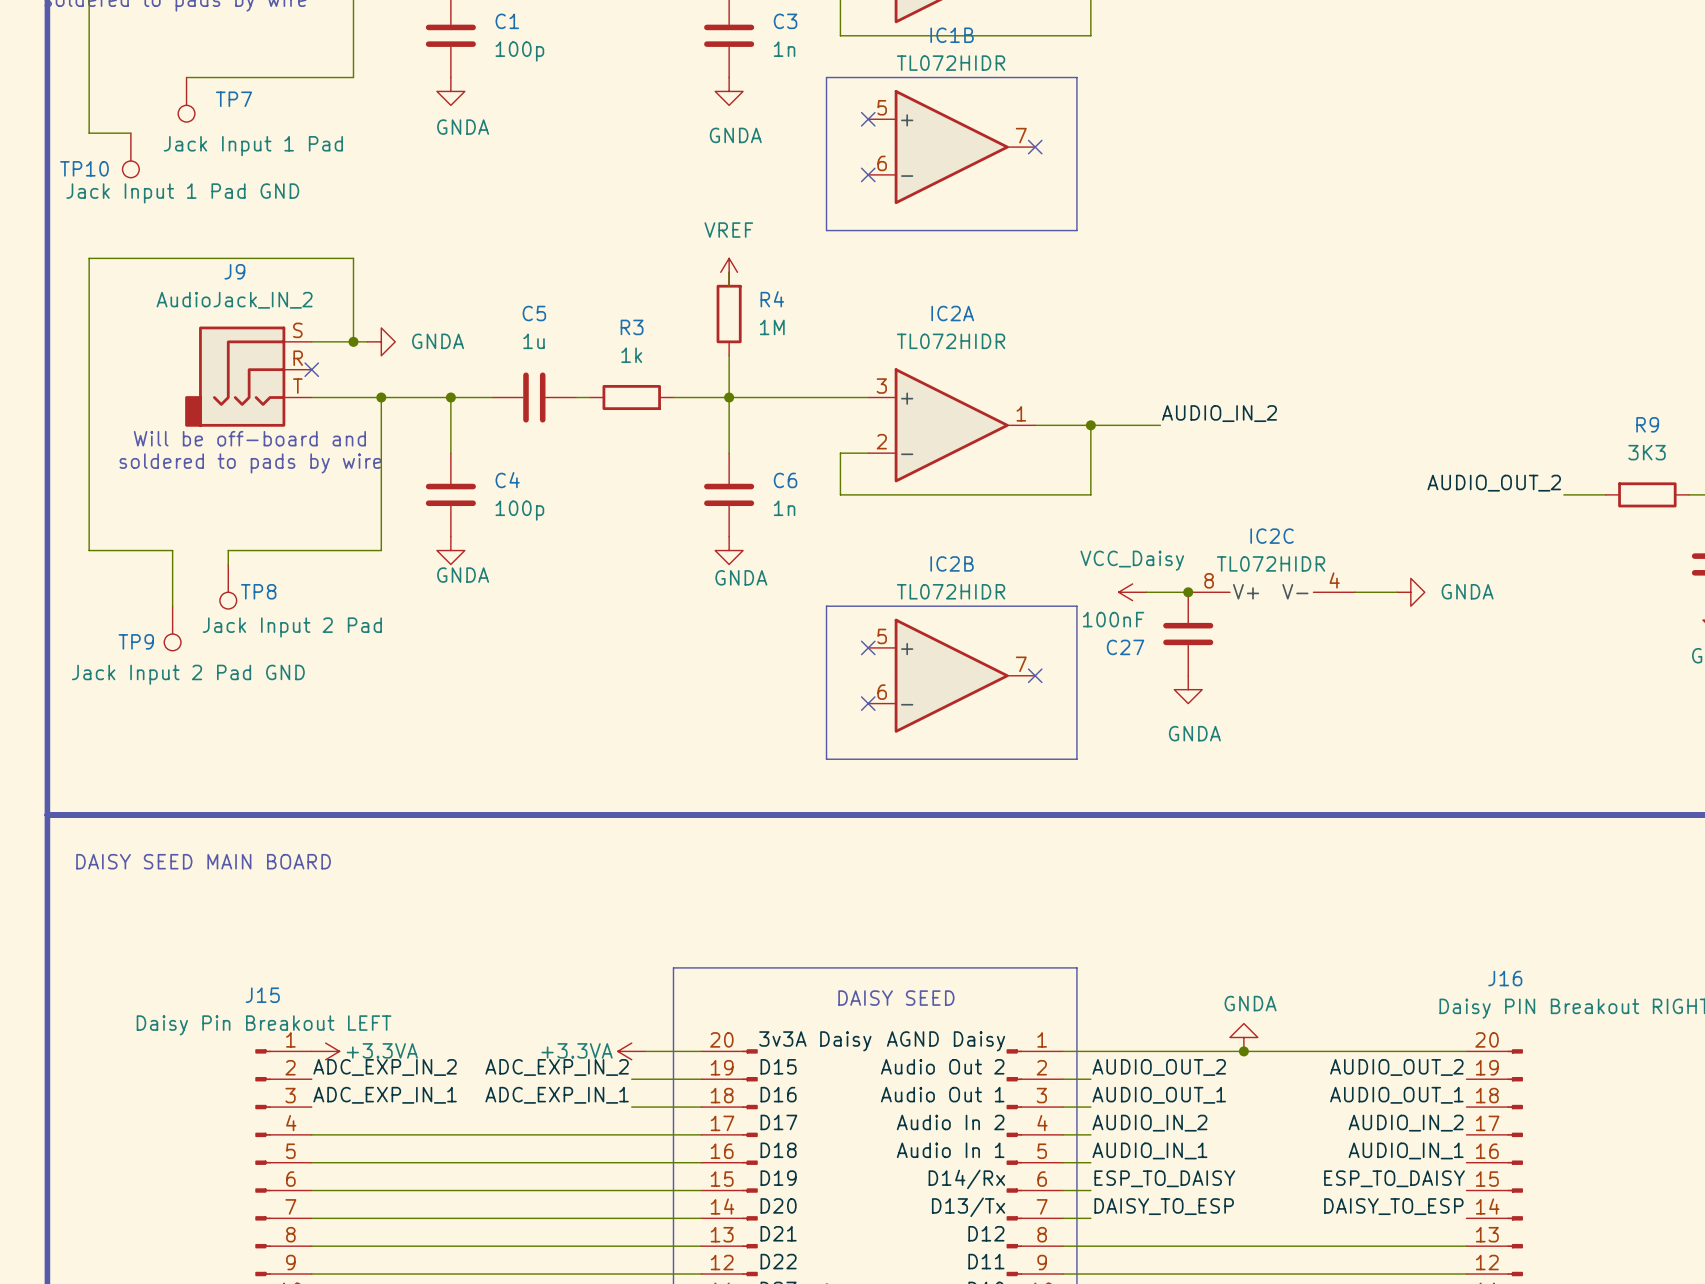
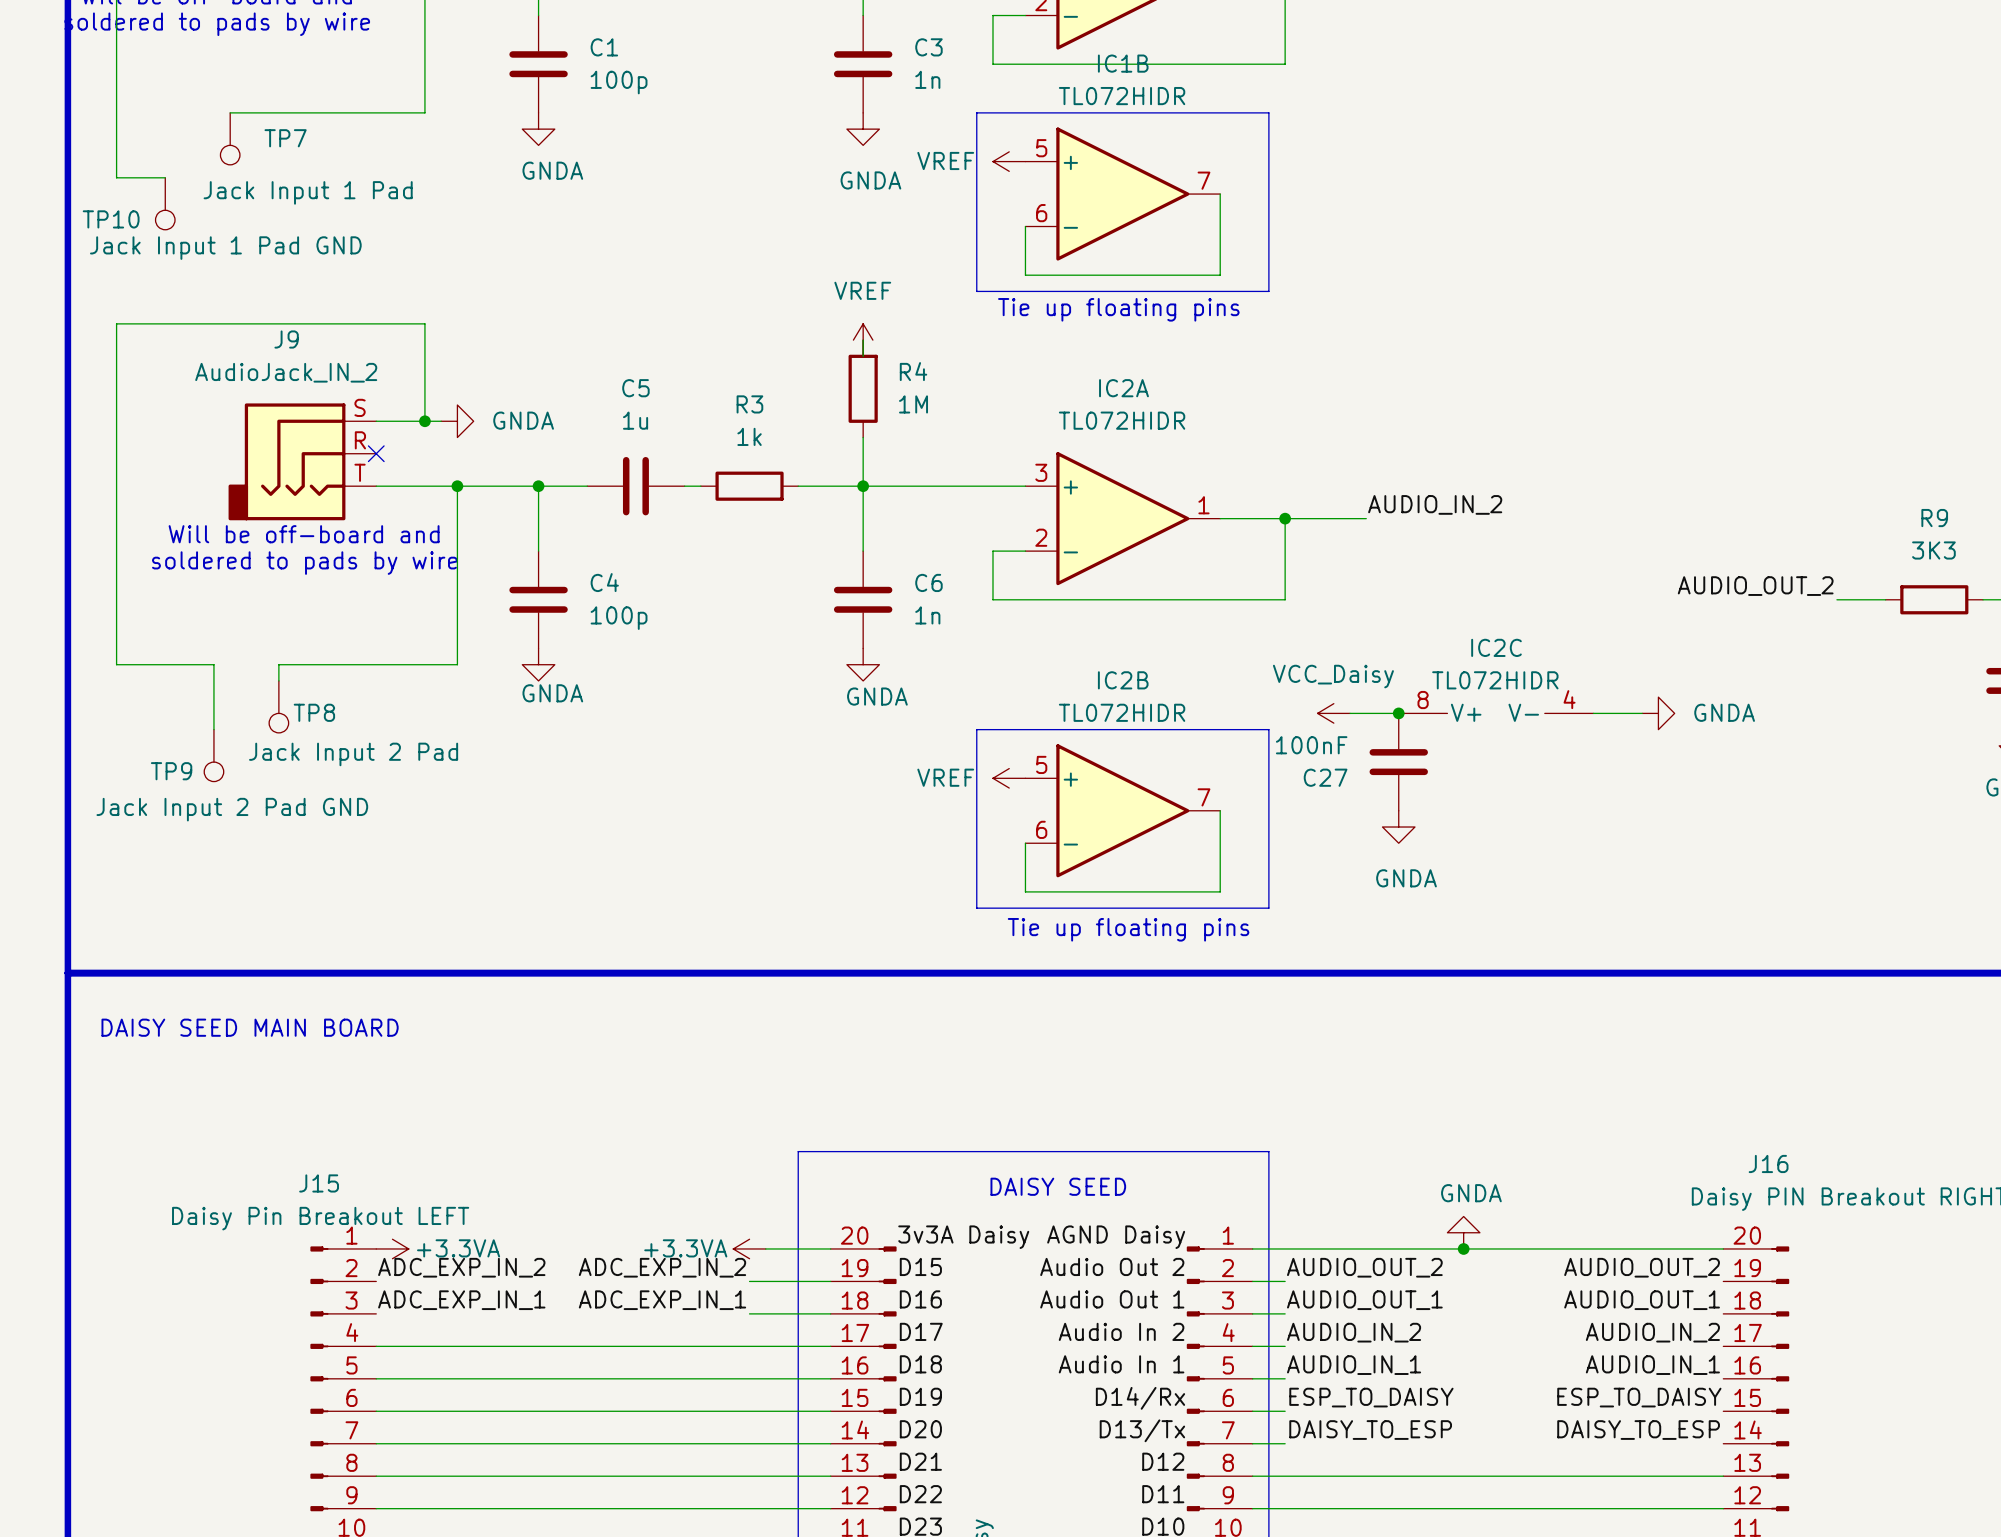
power symbol: none -> VREF (1009, 161)
no-connect mark: (868, 119) -> none
wire: none -> (1220, 194) (1220, 275) (1025, 275) (1025, 226)
no-connect mark: (1035, 147) -> none
no-connect mark: (868, 174) -> none
text: none -> Tie up floating pins (1118, 309)
power symbol: none -> VREF (1009, 778)
no-connect mark: (868, 647) -> none
wire: none -> (1220, 810) (1220, 891) (1025, 891) (1025, 843)
no-connect mark: (1035, 675) -> none
no-connect mark: (868, 703) -> none
text: none -> Tie up floating pins (1128, 929)

